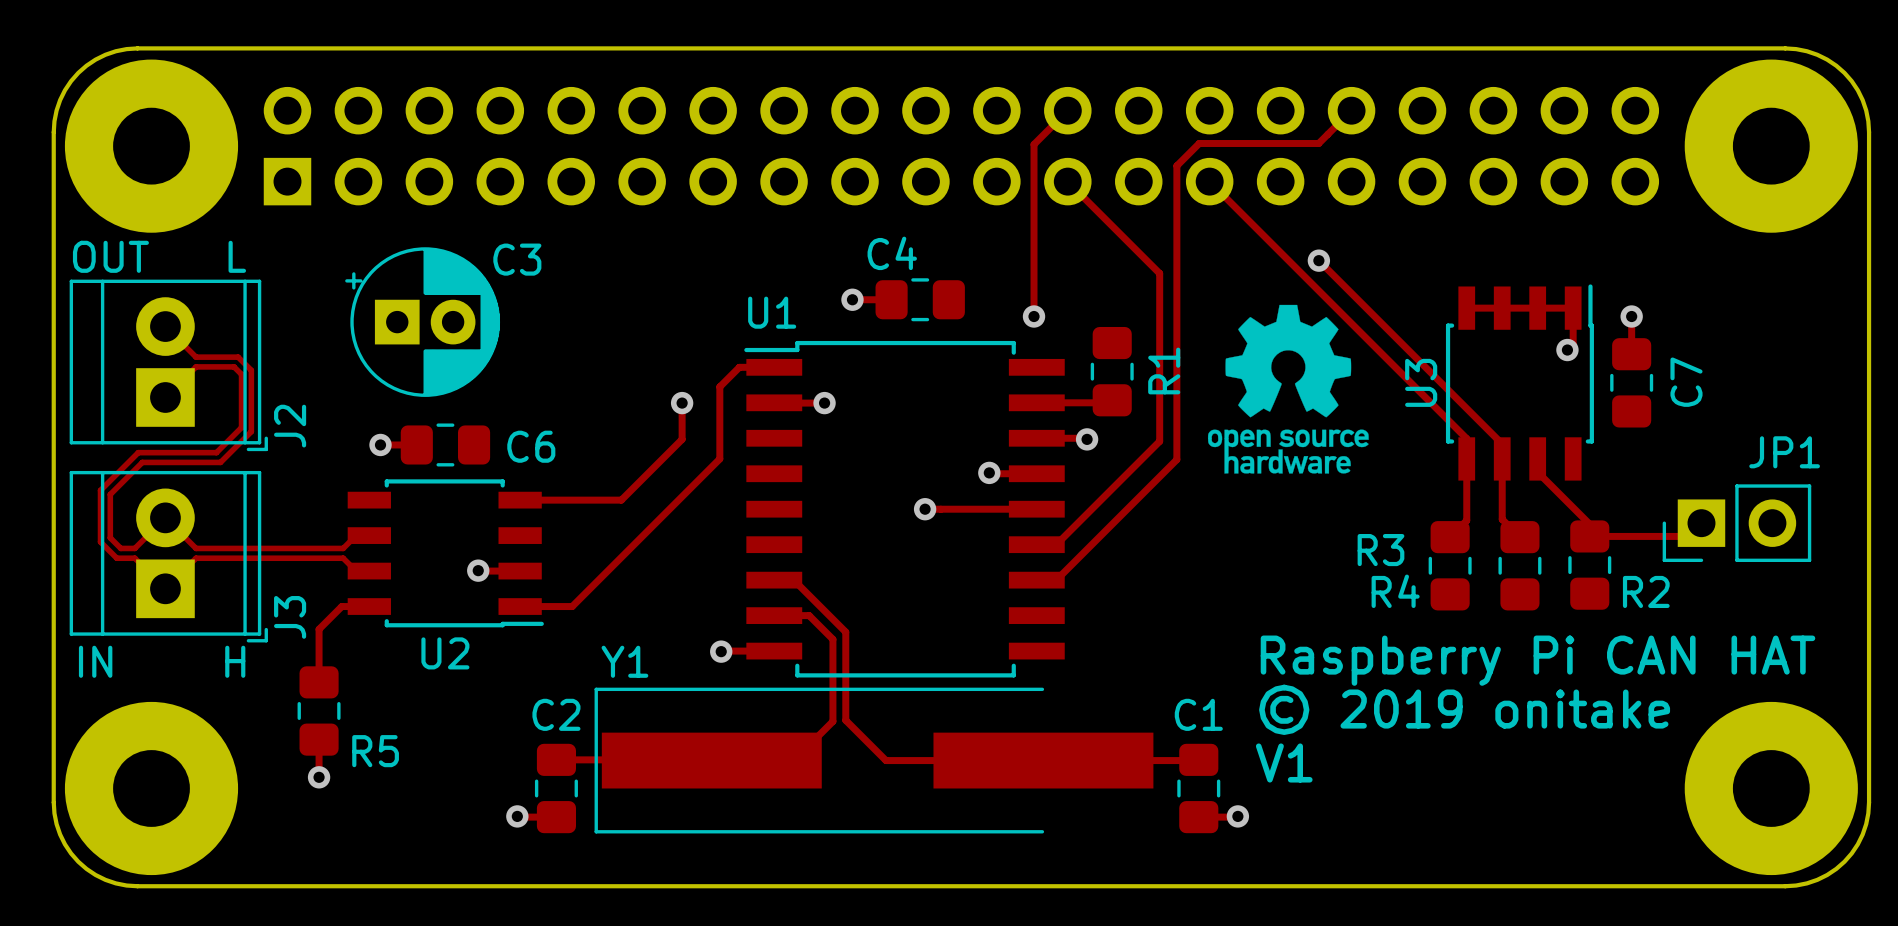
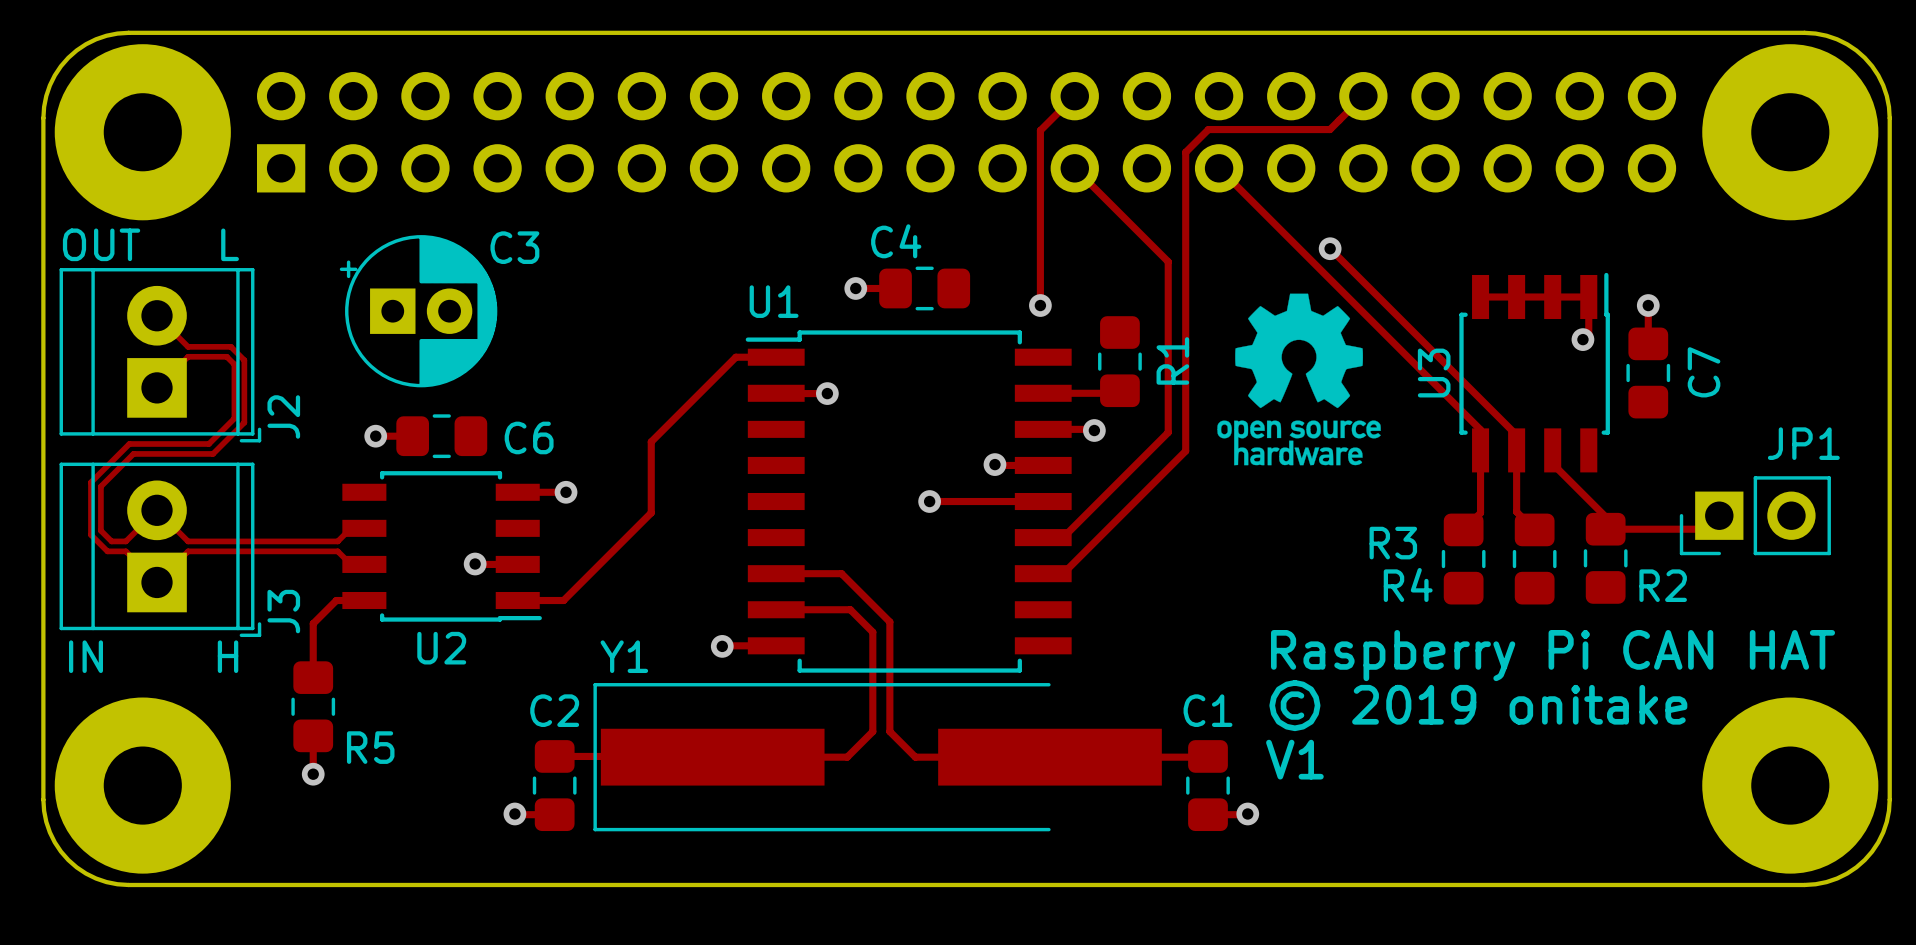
track: (739, 367) (719, 386) (719, 458) (572, 606) (565, 606) -> (740, 357) (735, 357) (651, 441) (651, 512) (563, 600)
track: (682, 403) (682, 439) (621, 500) (567, 500) -> none
via position: (682, 403) -> (566, 492)
track: (793, 580) (845, 632) (845, 720) (885, 760) (911, 760) -> (796, 573) (841, 573) (889, 621) (889, 731) (915, 757)
track: (809, 615) (832, 639) (832, 721) (793, 760) -> (811, 609) (850, 609) (872, 632) (872, 731) (847, 757) (796, 757)

